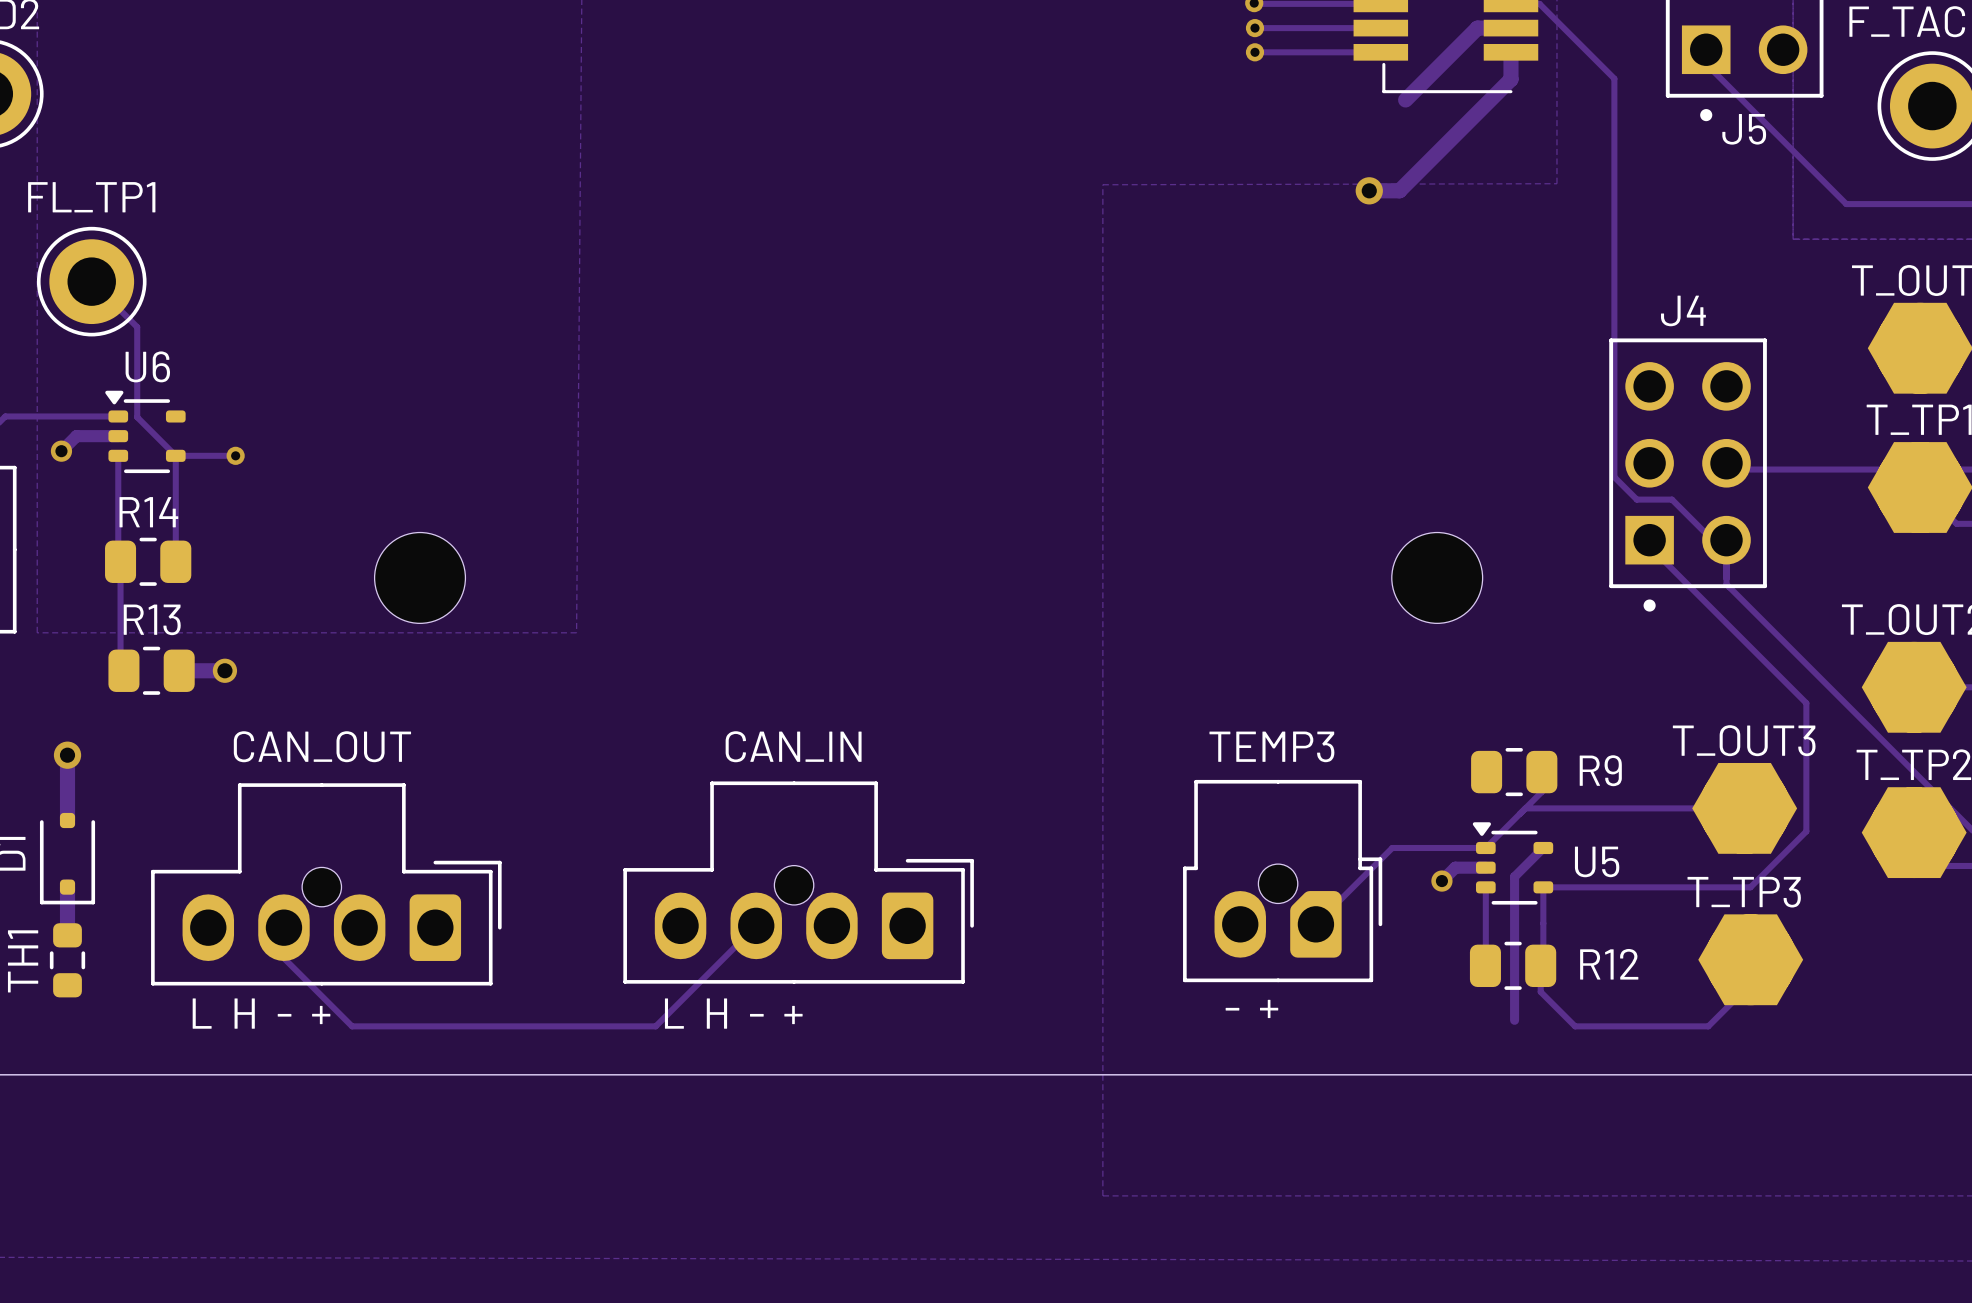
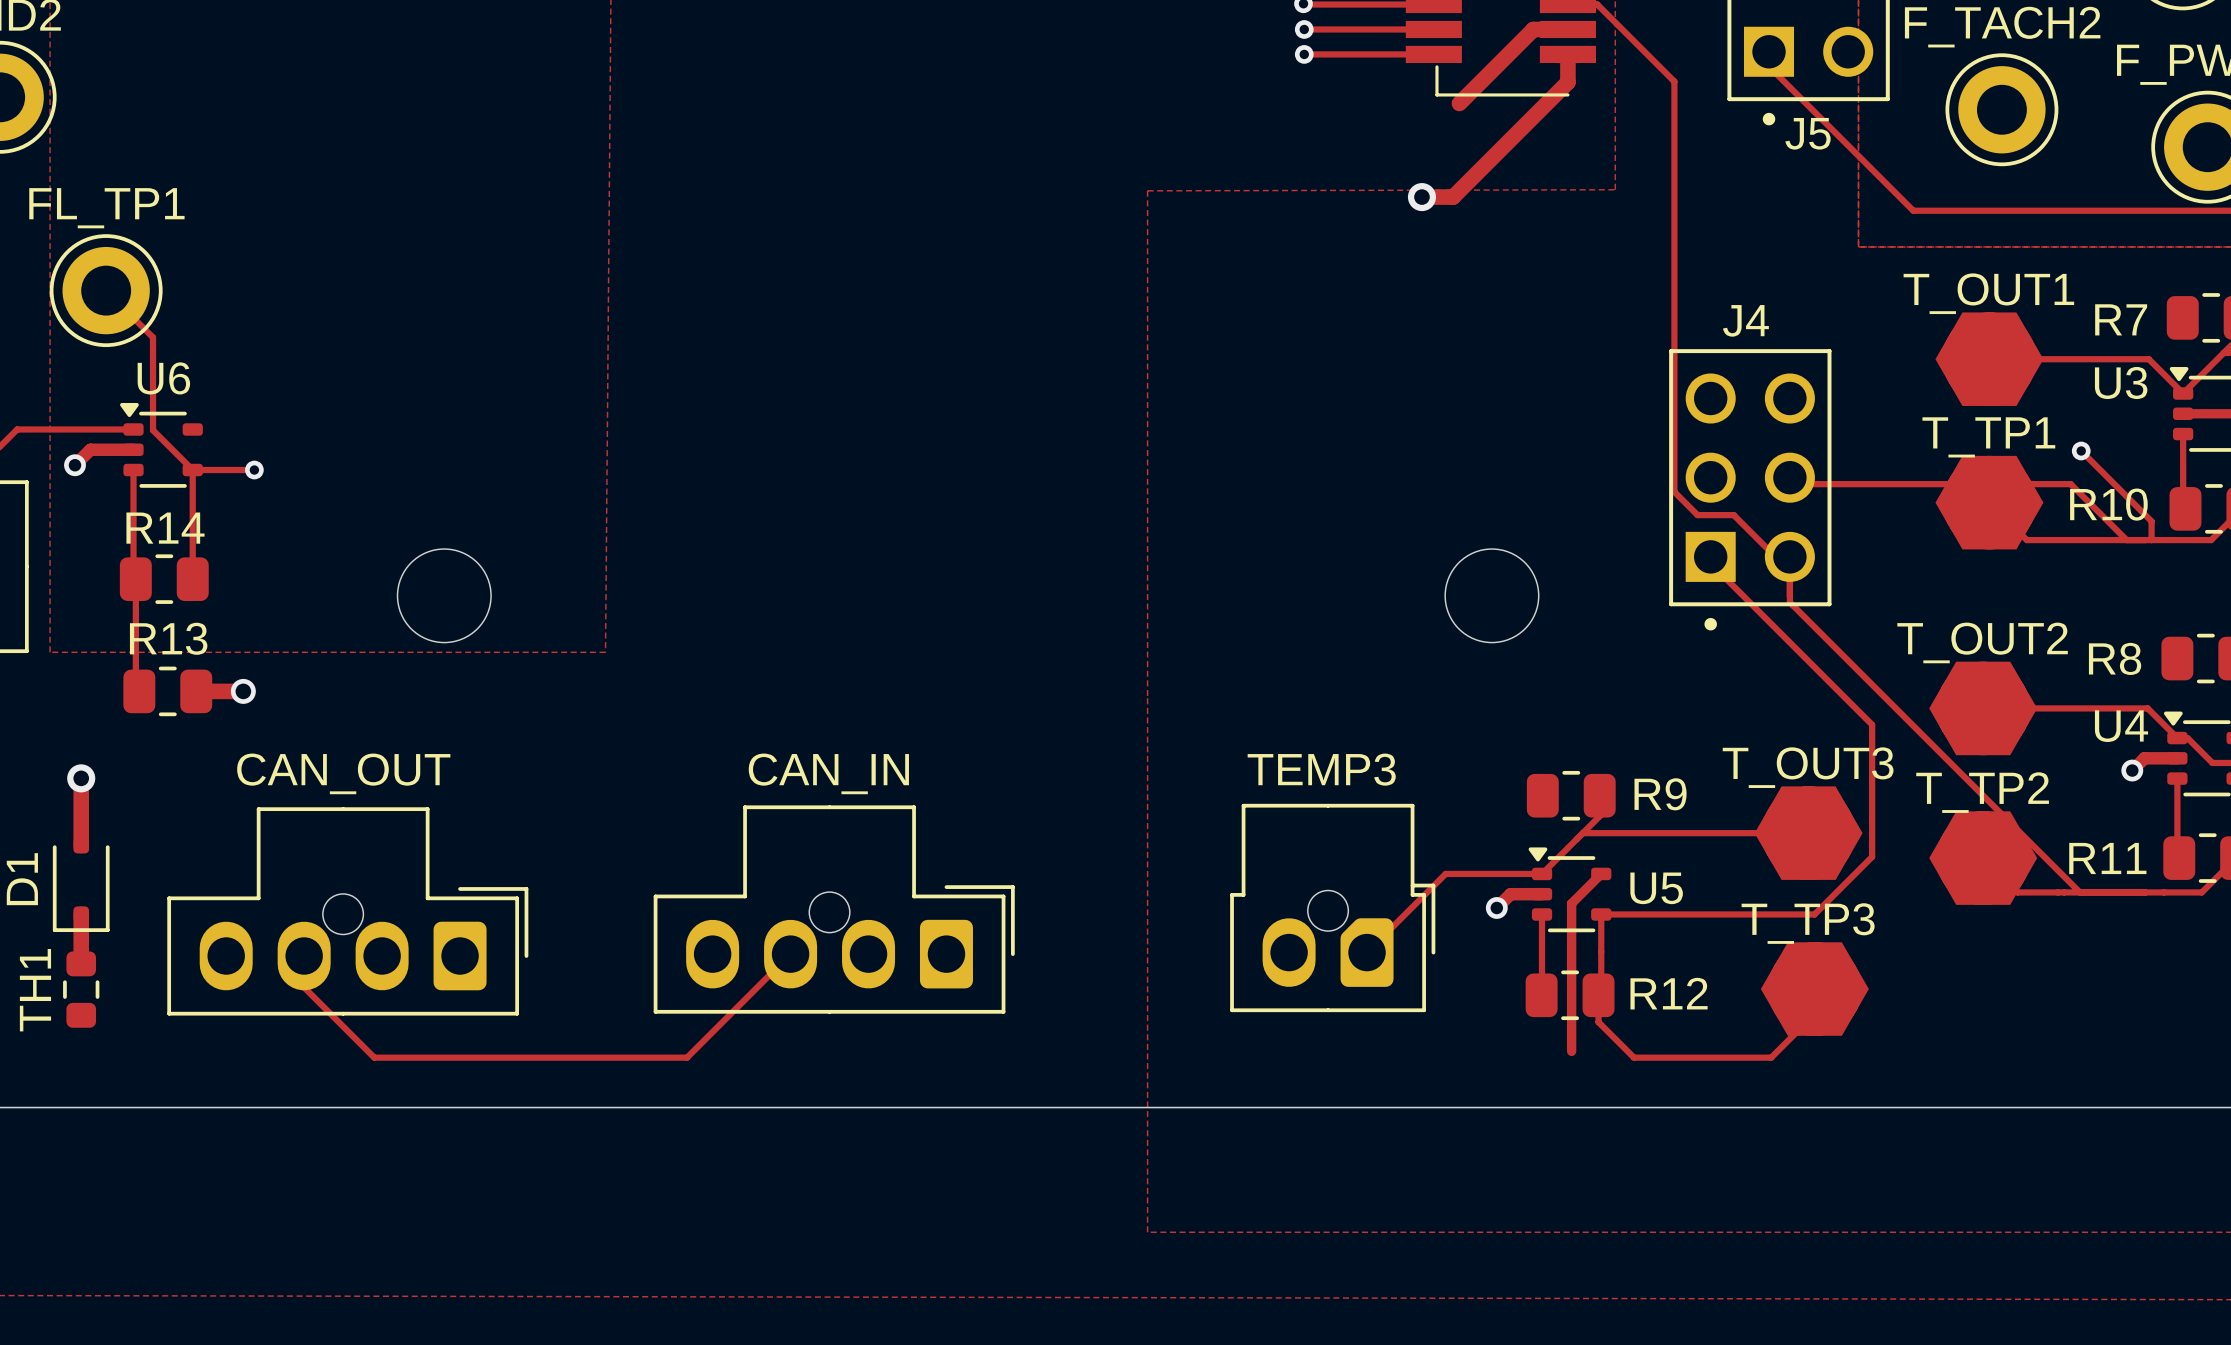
text: - + (1251, 1008) -> none
text: L H - + (261, 1013) -> none
text: L H - + (733, 1013) -> none

